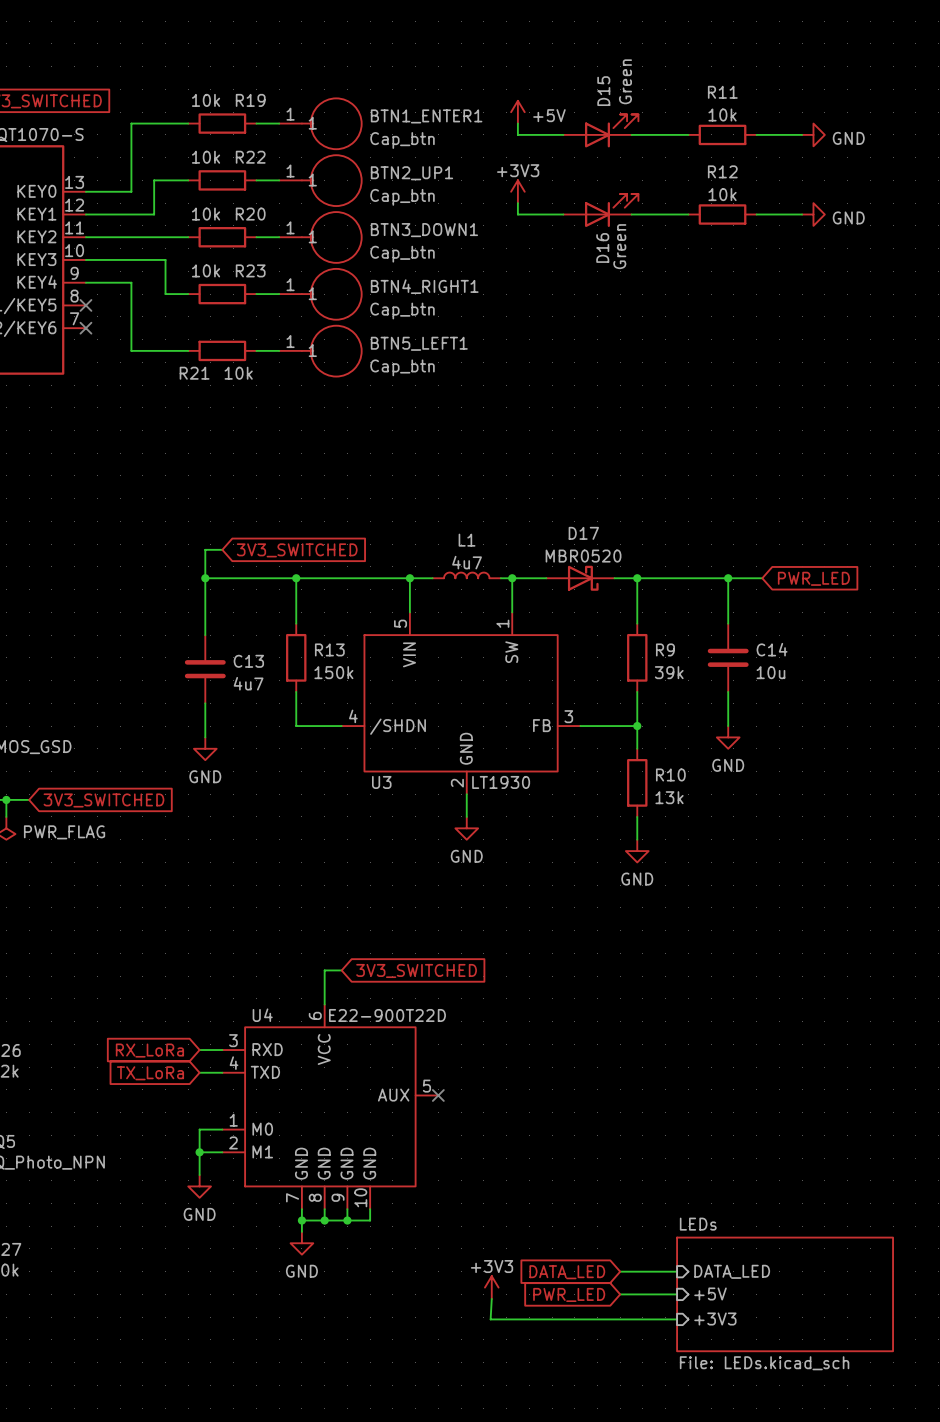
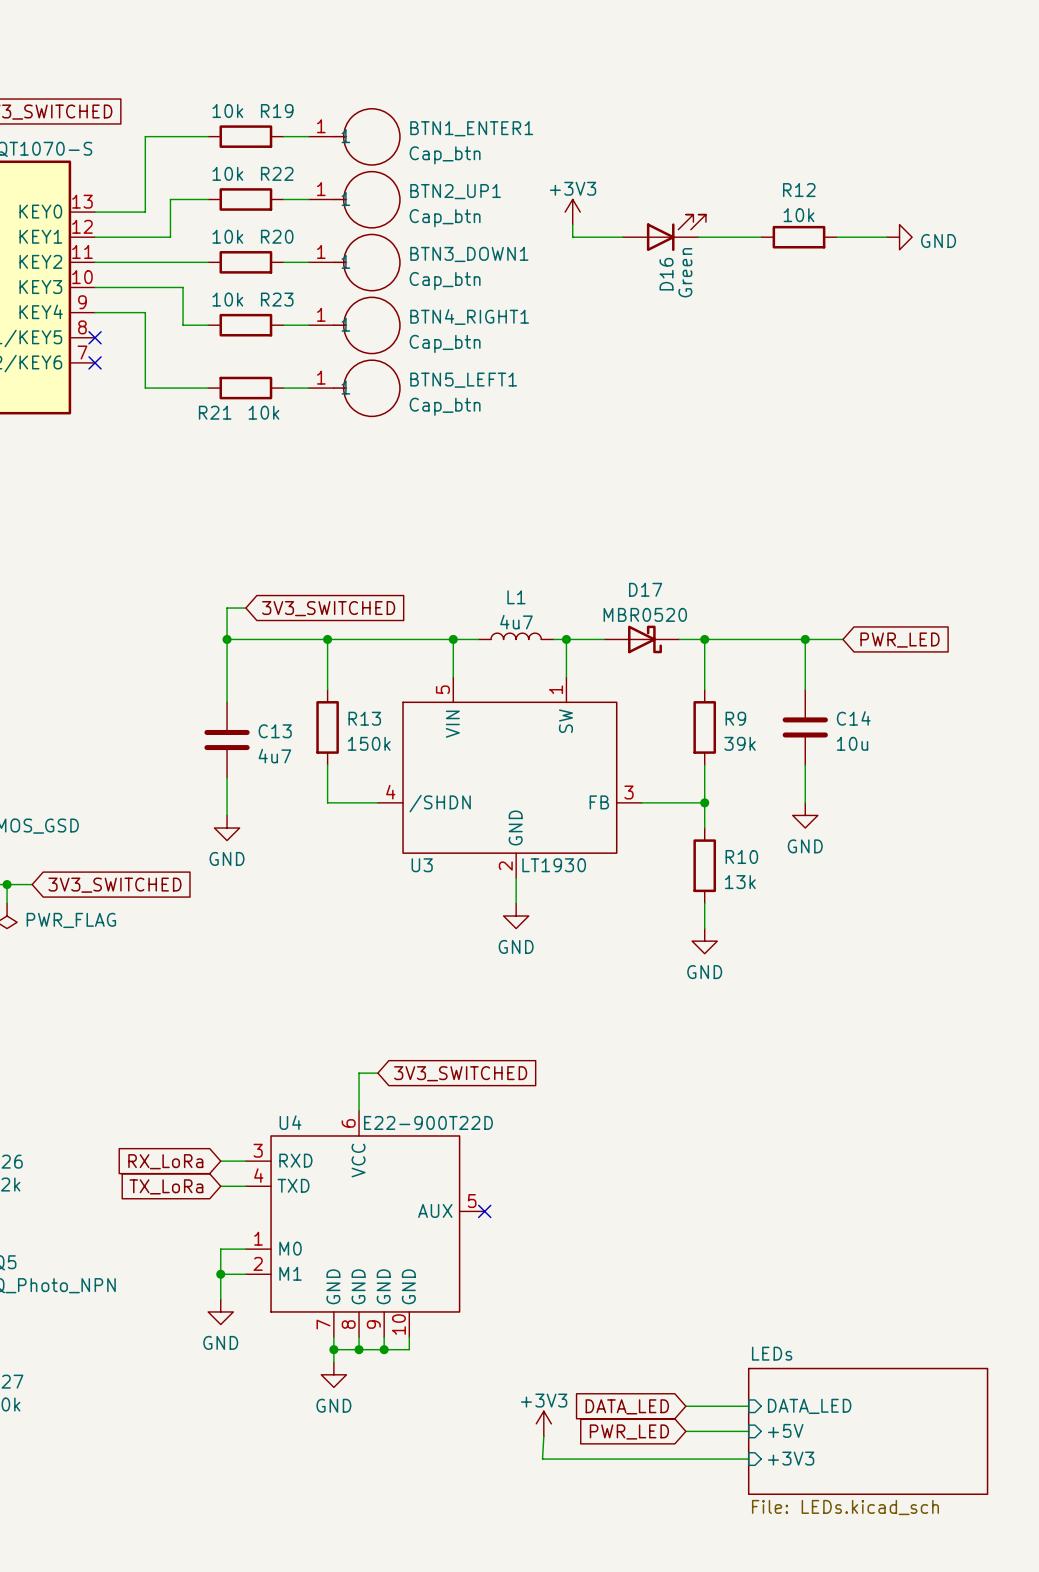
power symbol: +5V (517, 112) -> none
wire: (517, 123) (517, 134) (563, 134) -> none
D15: Green (600, 130) -> none
wire: (631, 134) (688, 134) -> none
R11: 10k (722, 134) -> none
wire: (756, 134) (802, 134) -> none
power symbol: GND (813, 134) -> none

